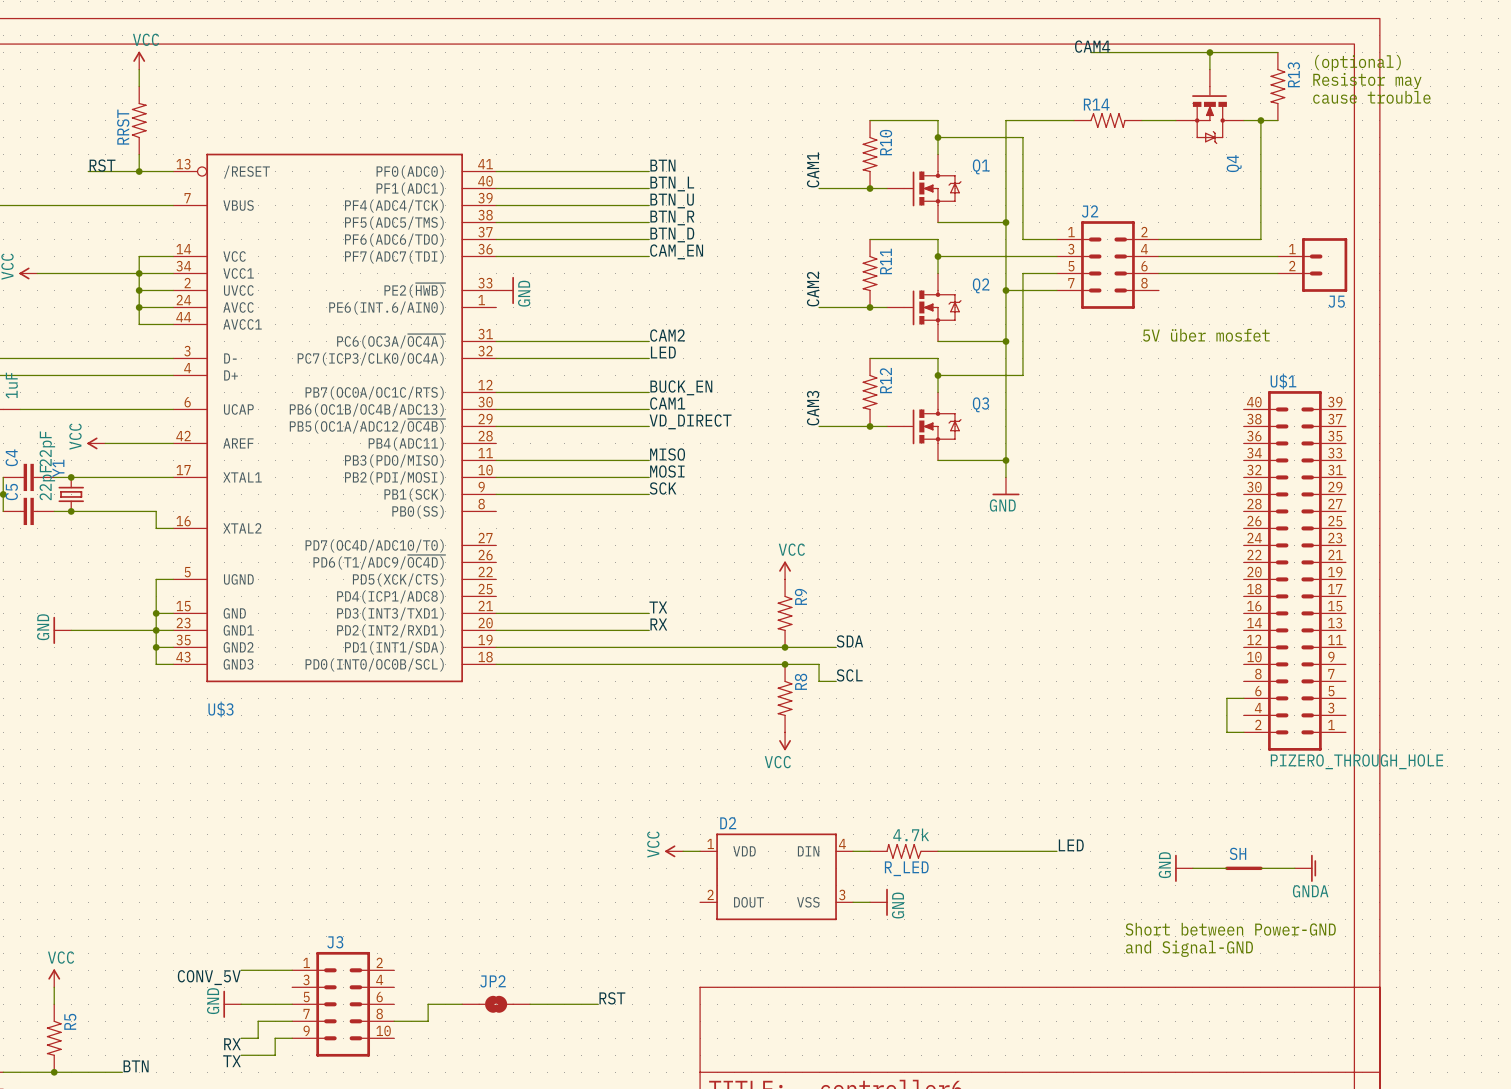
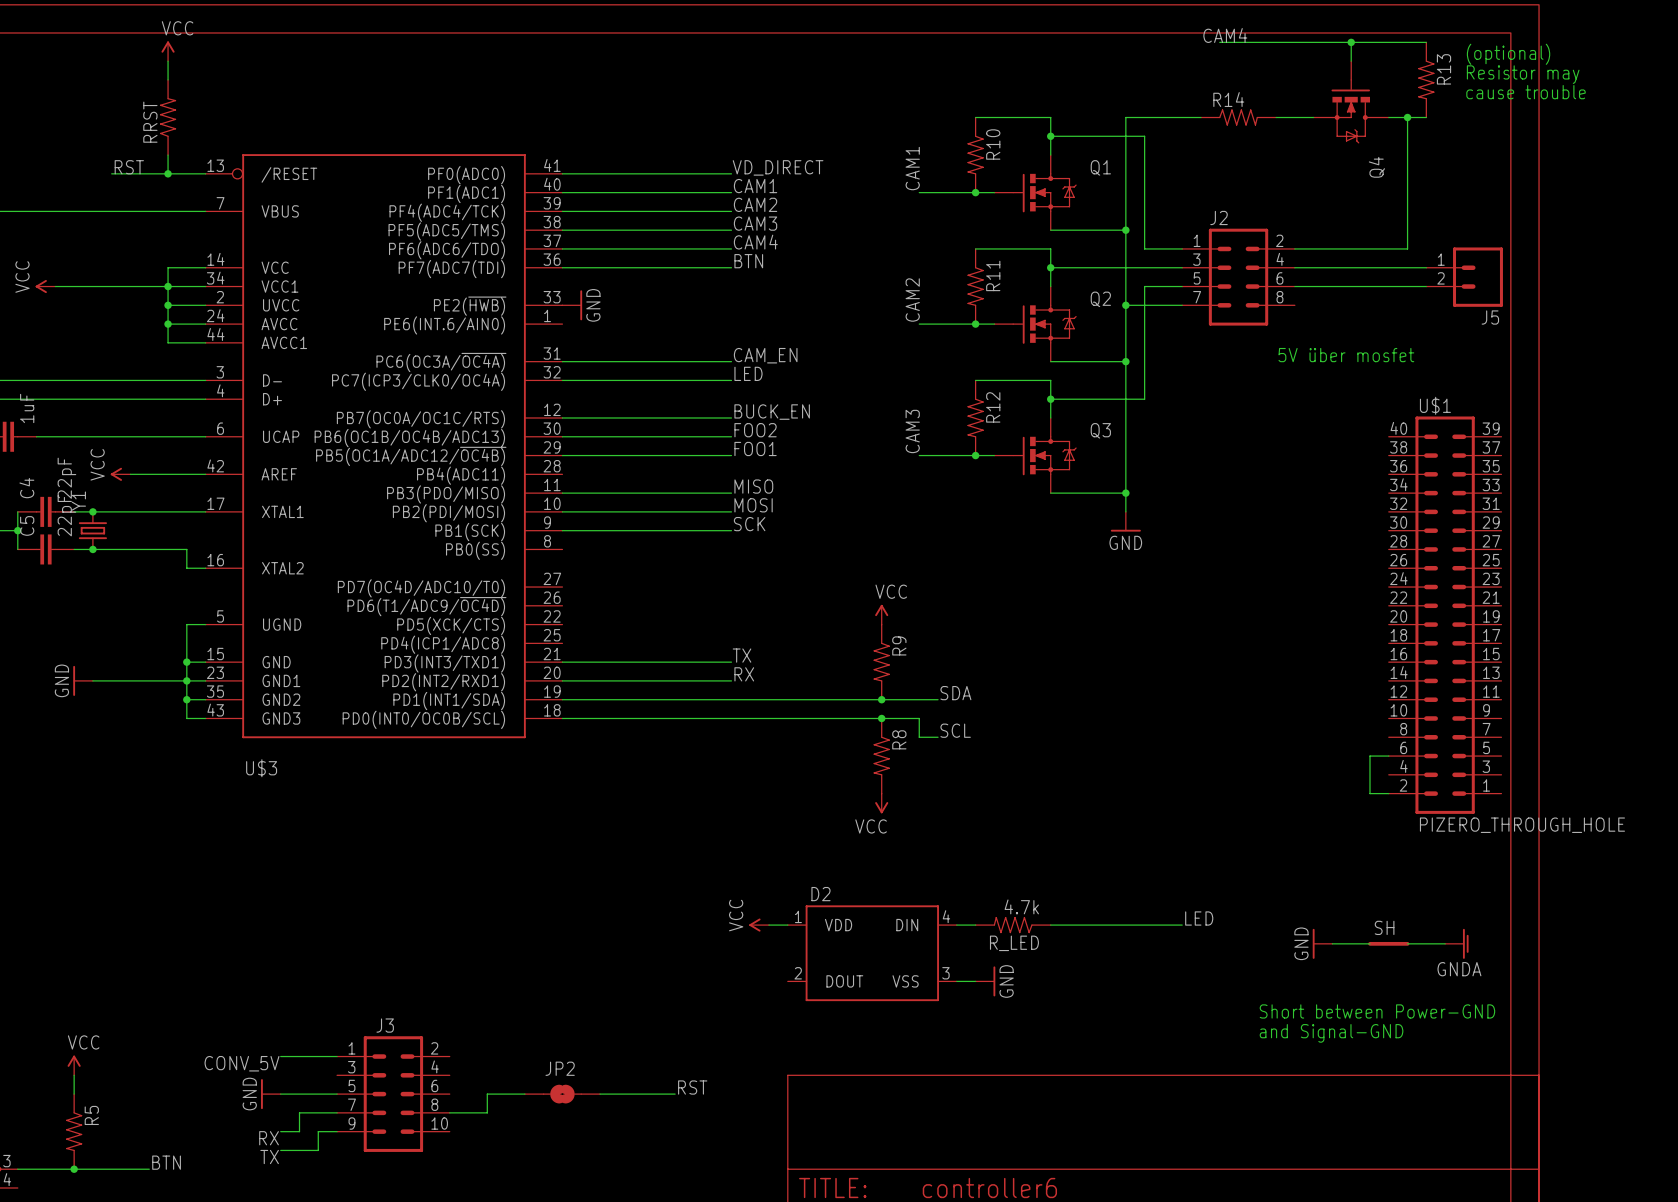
label: BTN (662, 165) -> VD_DIRECT (778, 167)
label: BTN_L (672, 184) -> CAM1 (755, 186)
label: BTN_U (672, 201) -> CAM2 (755, 204)
label: BTN_R (672, 218) -> CAM3 (755, 223)
label: BTN_D (672, 234) -> CAM4 (755, 242)
label: CAM_EN (676, 251) -> BTN (748, 261)
label: CAM2 (667, 335) -> CAM_EN (765, 355)
label: CAM1 (667, 403) -> FOO2 (755, 430)
label: VD_DIRECT (690, 421) -> FOO1 (755, 448)

